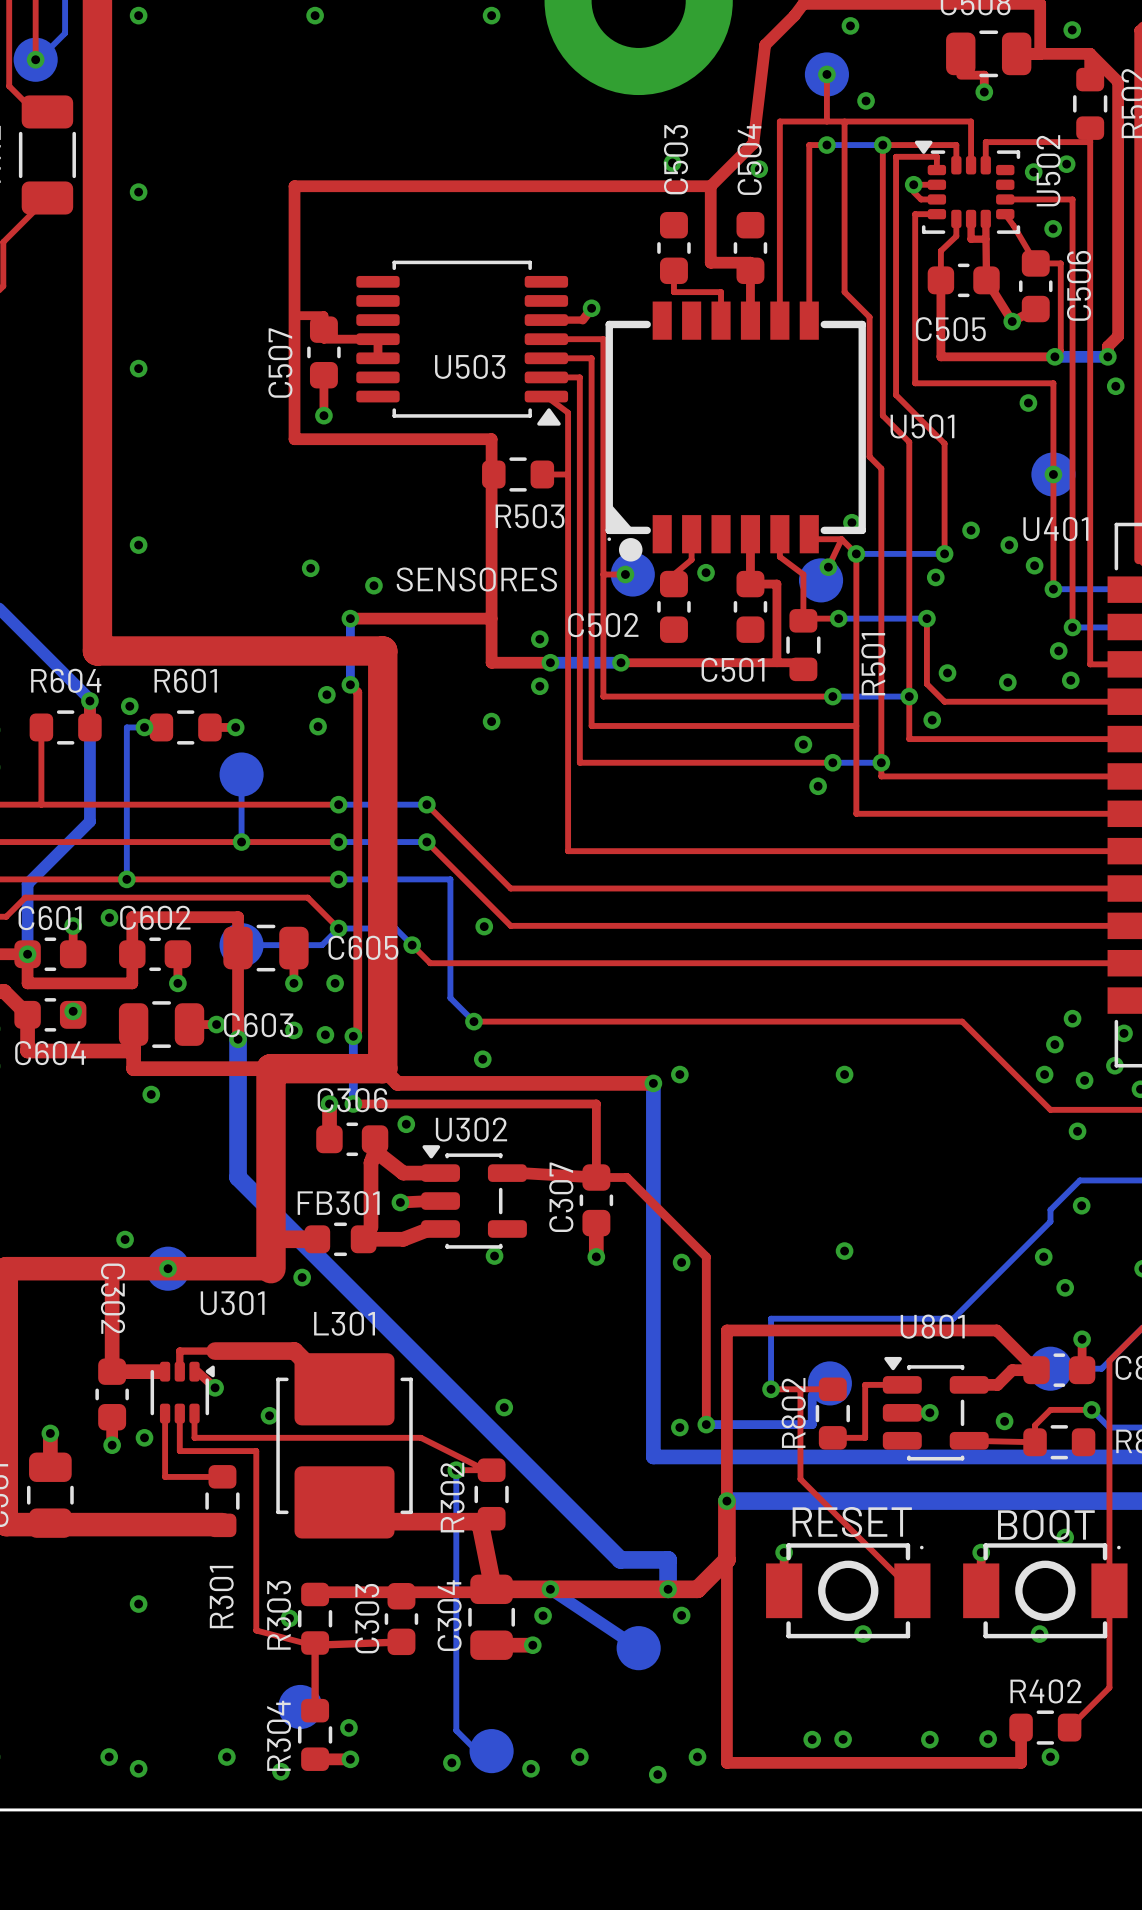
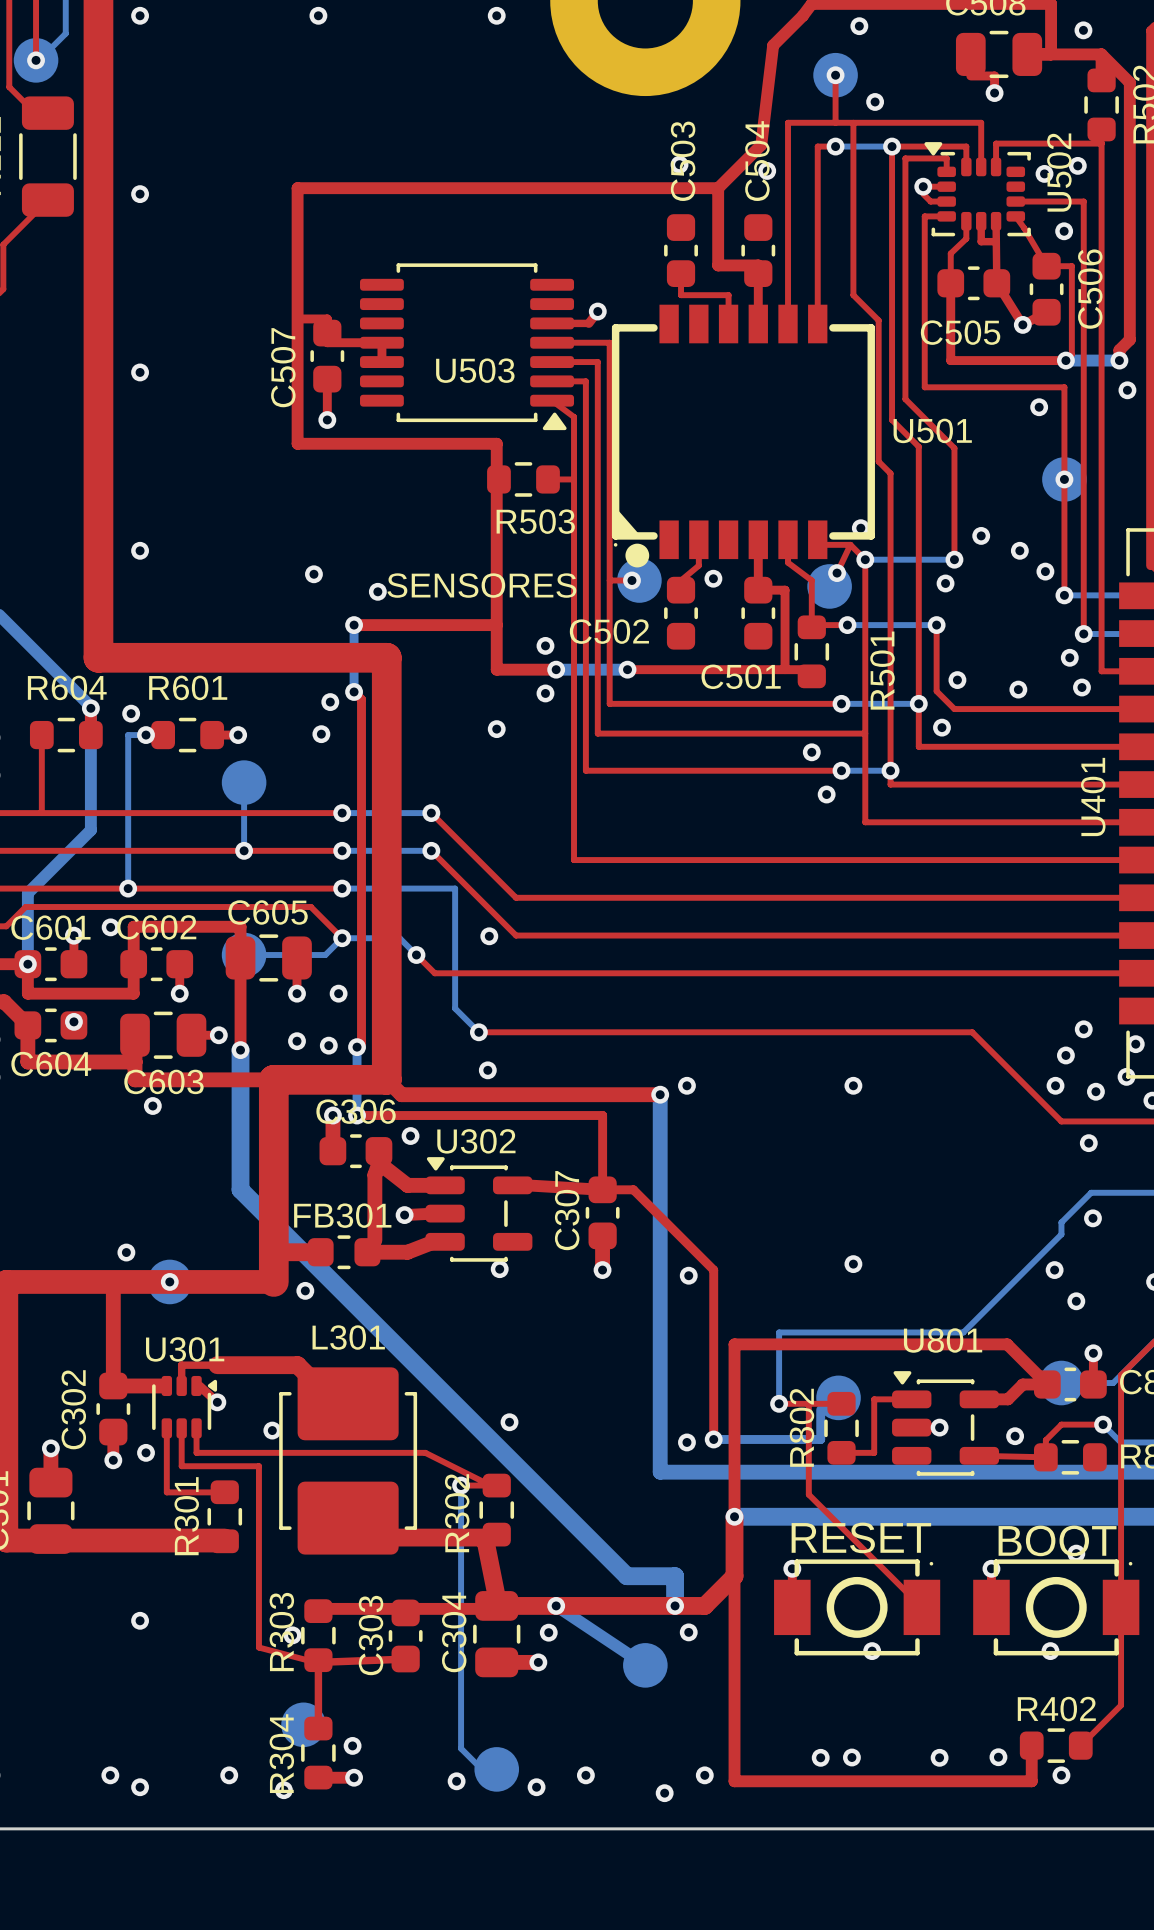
U401 name rotation: 0° (1055, 529) -> 90° counterclockwise (1093, 796)
U401 name position: U401 (1055, 529) -> U401 (1093, 796)
C605 name position: C605 (363, 947) -> C605 (268, 912)
C603 name position: C603 (258, 1025) -> C603 (163, 1081)
C302 name rotation: 0° (113, 1298) -> 180° (73, 1409)
U301 name position: U301 (232, 1303) -> U301 (185, 1349)
R301 name position: R301 (221, 1597) -> R301 (186, 1516)

